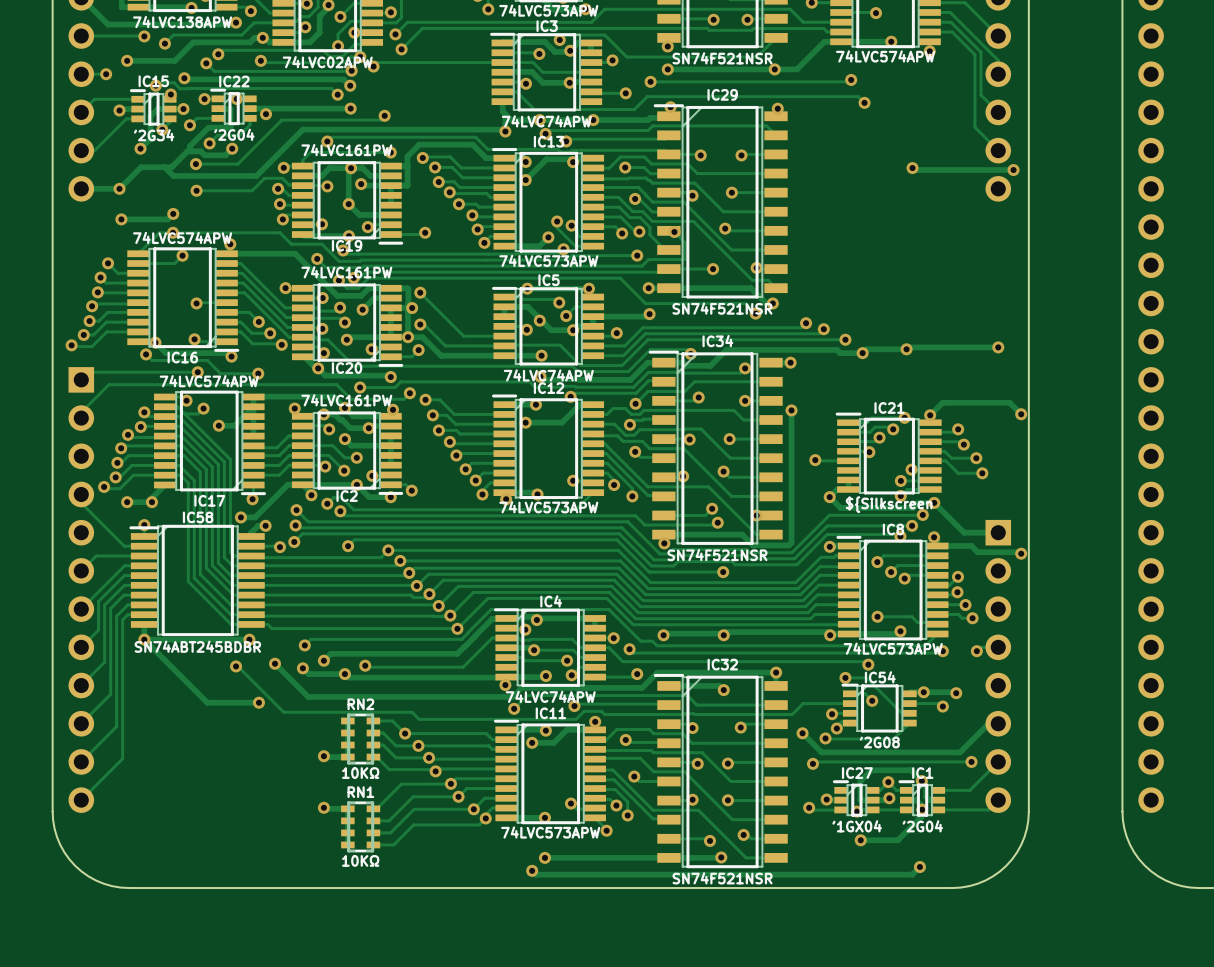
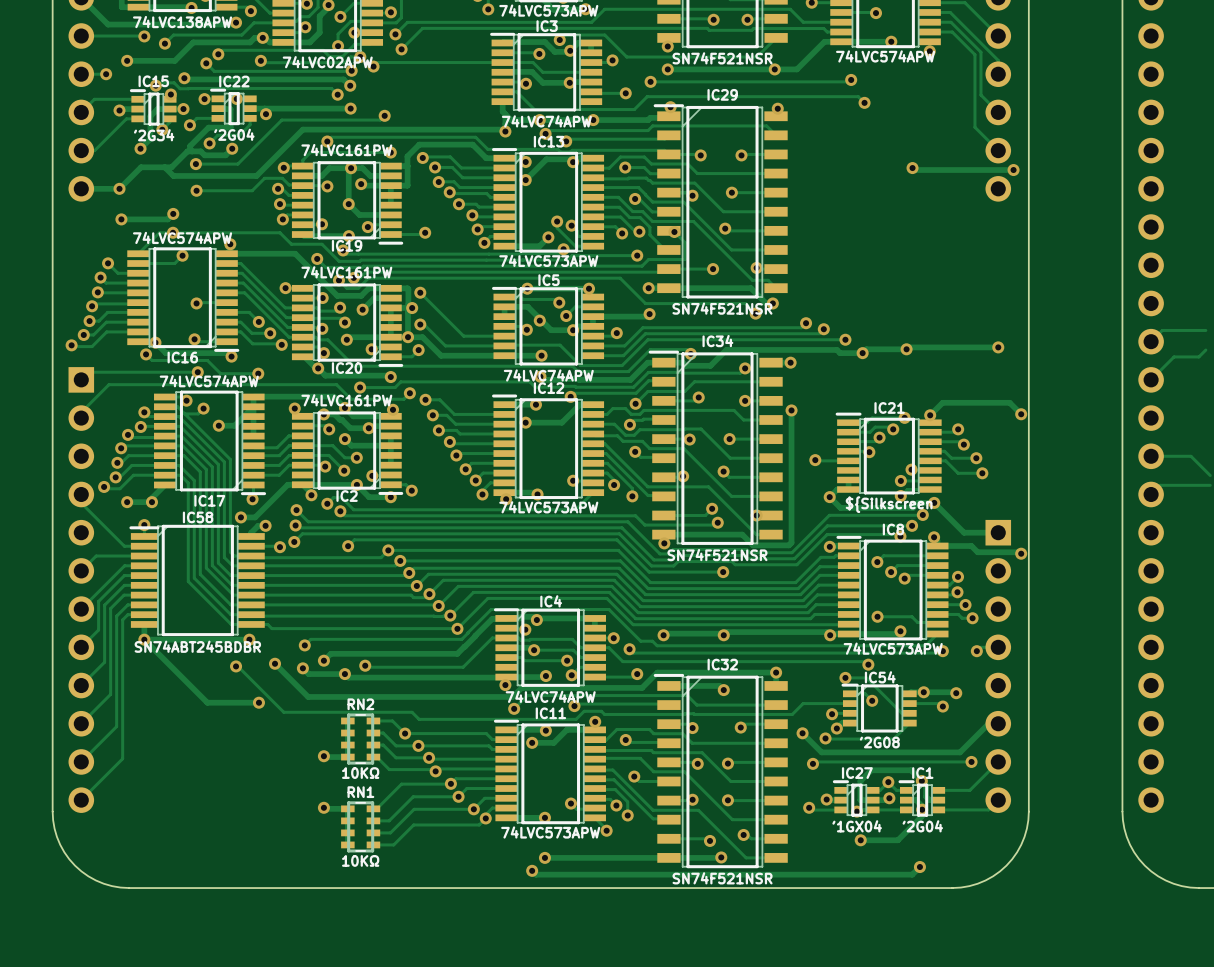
track: none -> (1205, 330) (1162, 330) (1151, 341)
track: none -> (1205, 350) (1198, 356) (1174, 356) (1151, 379)
track: none -> (1151, 456) (1191, 456) (1210, 475)
track: none -> (1210, 485) (1160, 485) (1151, 494)

